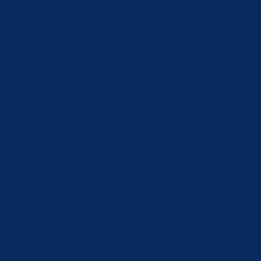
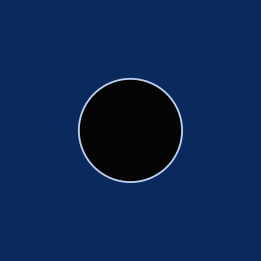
part: none -> (130, 130)

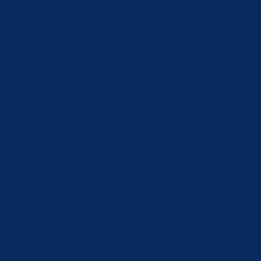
part: (130, 130) -> none

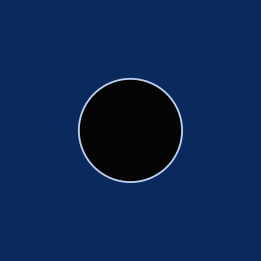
part: none -> (130, 130)

